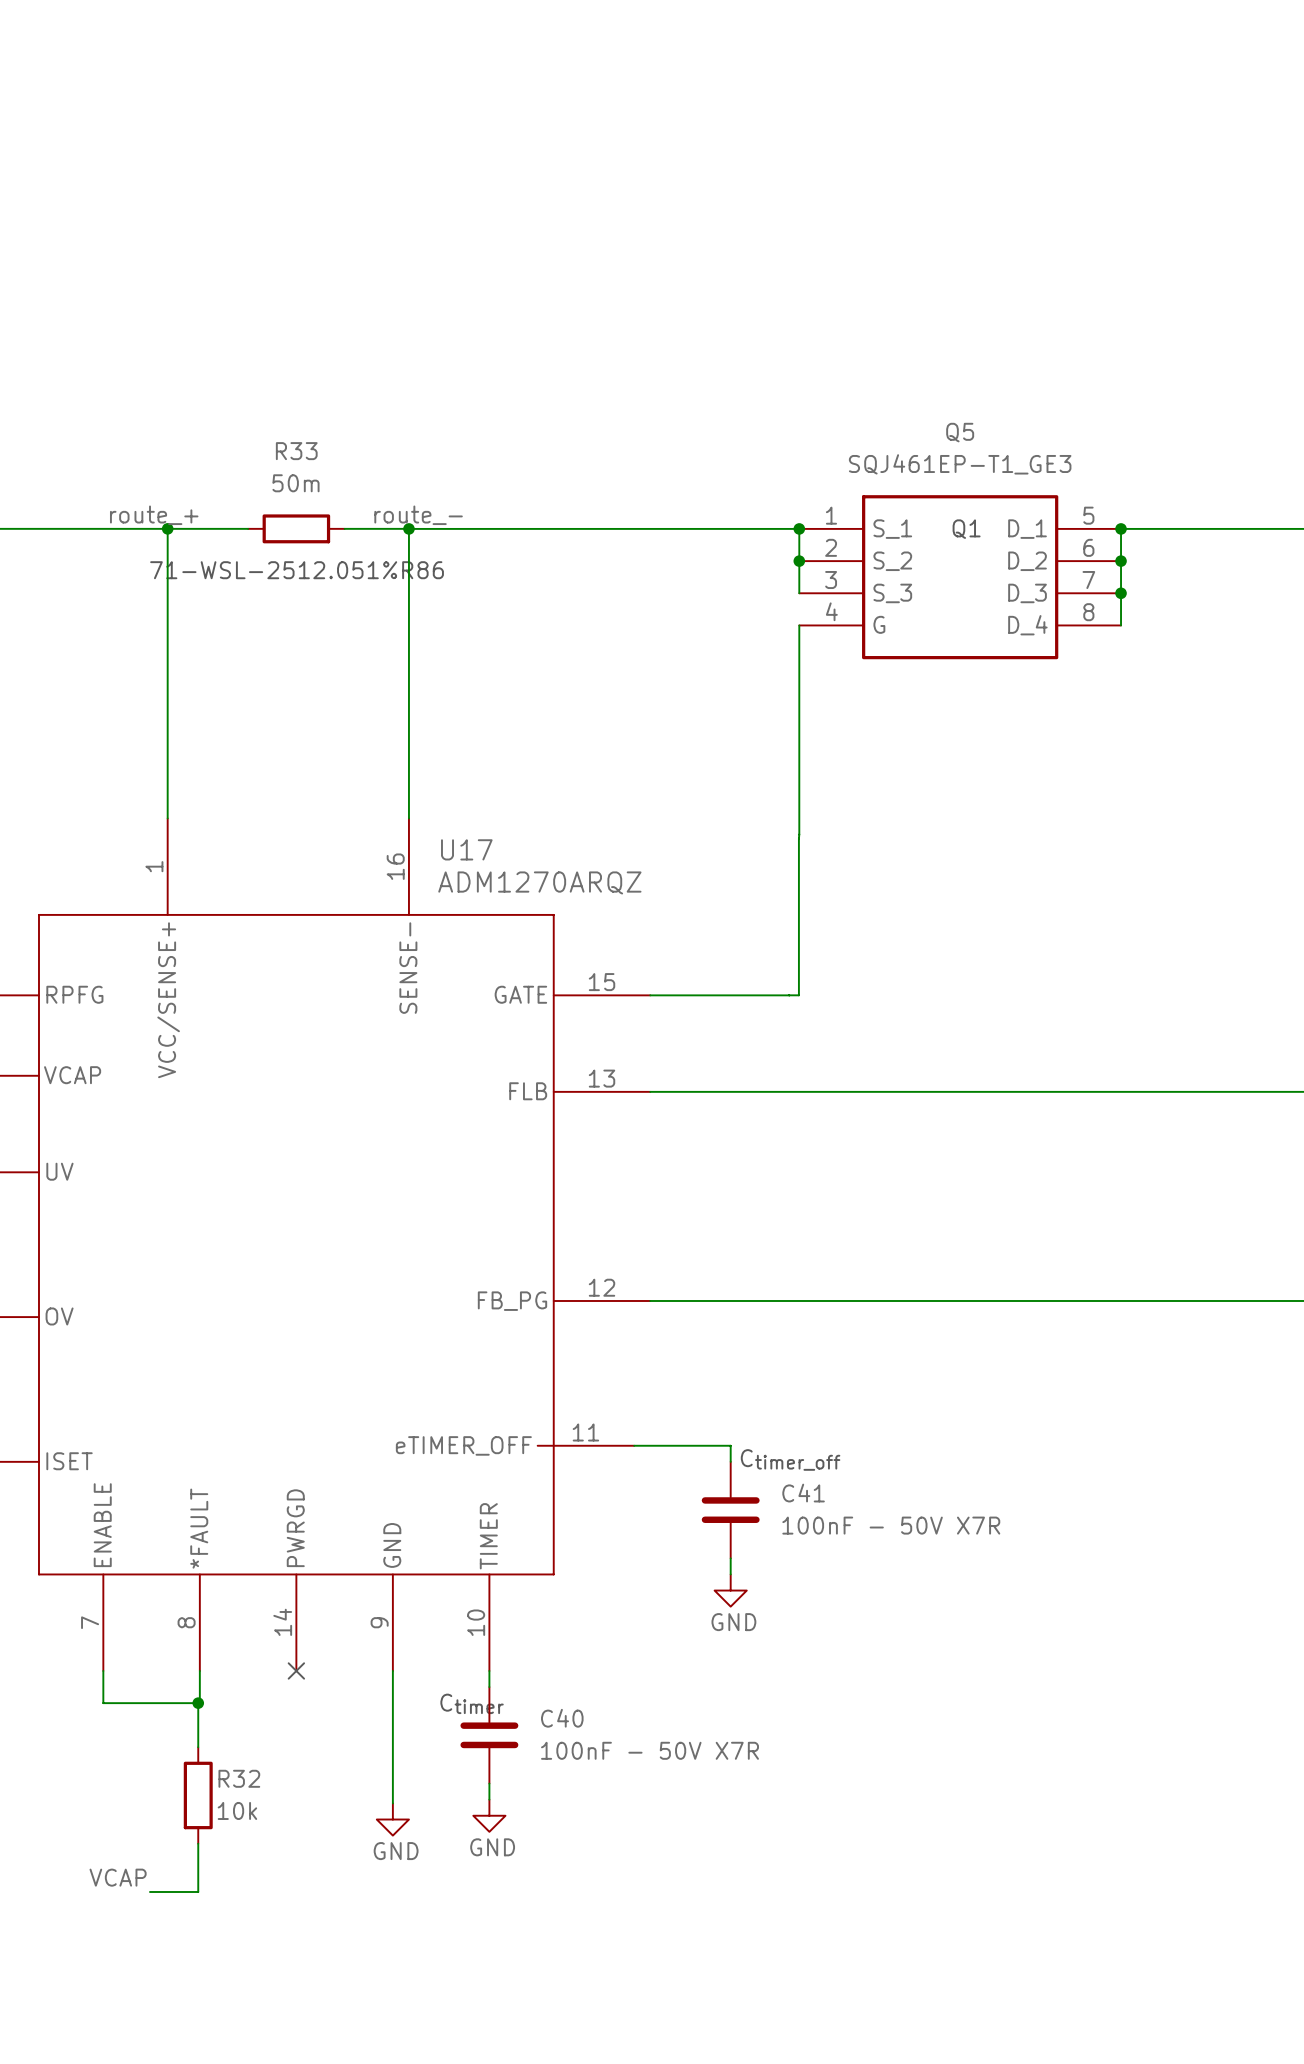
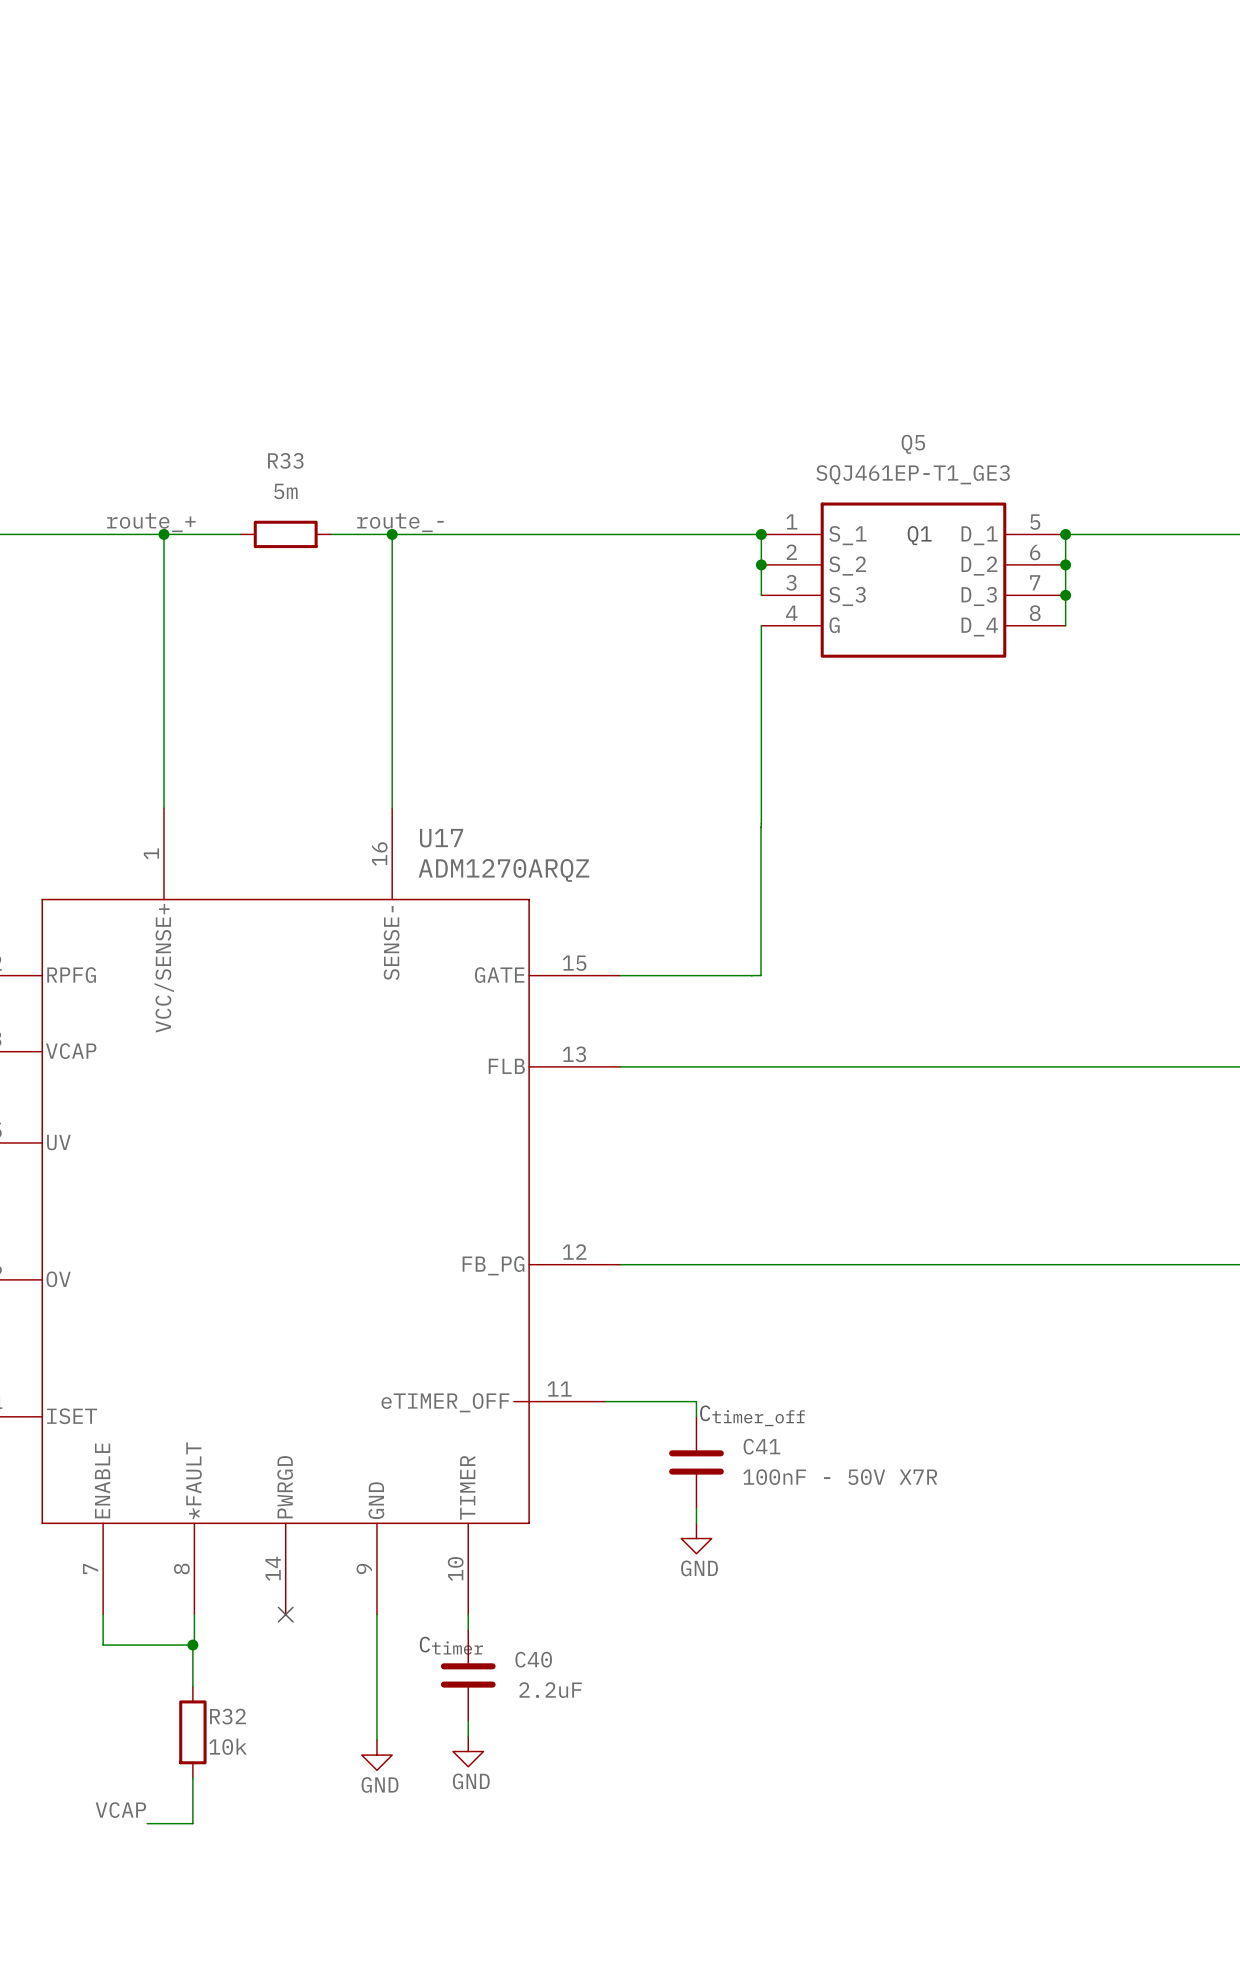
R33 value: 50m (295, 483) -> 5m (285, 491)
text: 71-WSL-2512.051%R86 (297, 570) -> none
C40 value: 100nF - 50V X7R (650, 1750) -> 2.2uF (550, 1690)

